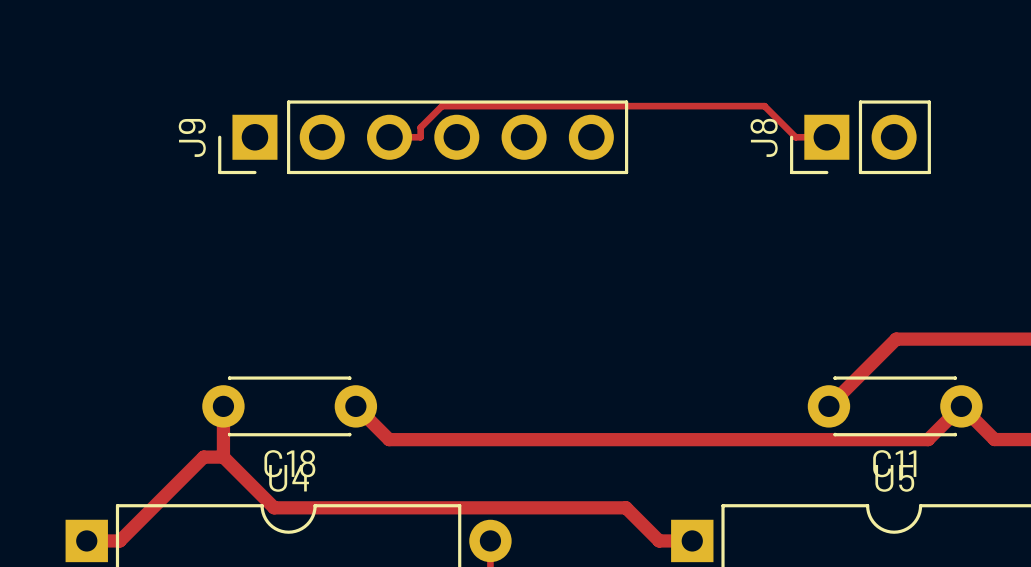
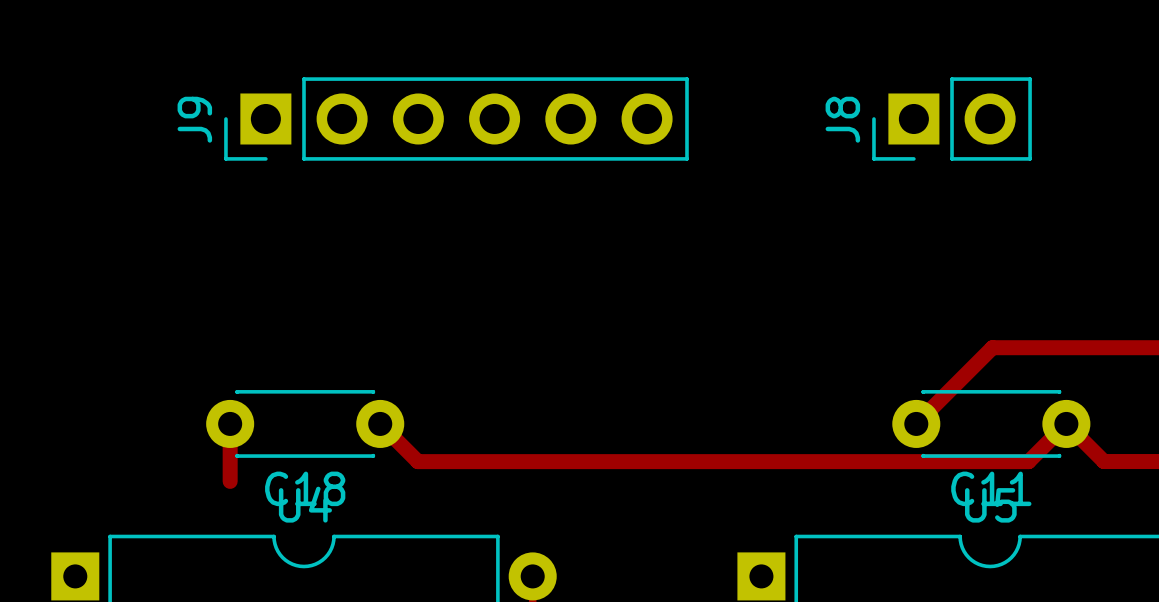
track: (389, 137) (420, 137) (420, 127) (442, 106) (764, 106) (795, 137) (826, 137) -> none
track: (86, 540) (119, 540) (203, 457) (223, 457) (274, 507) (626, 507) (659, 540) (692, 540) -> none

